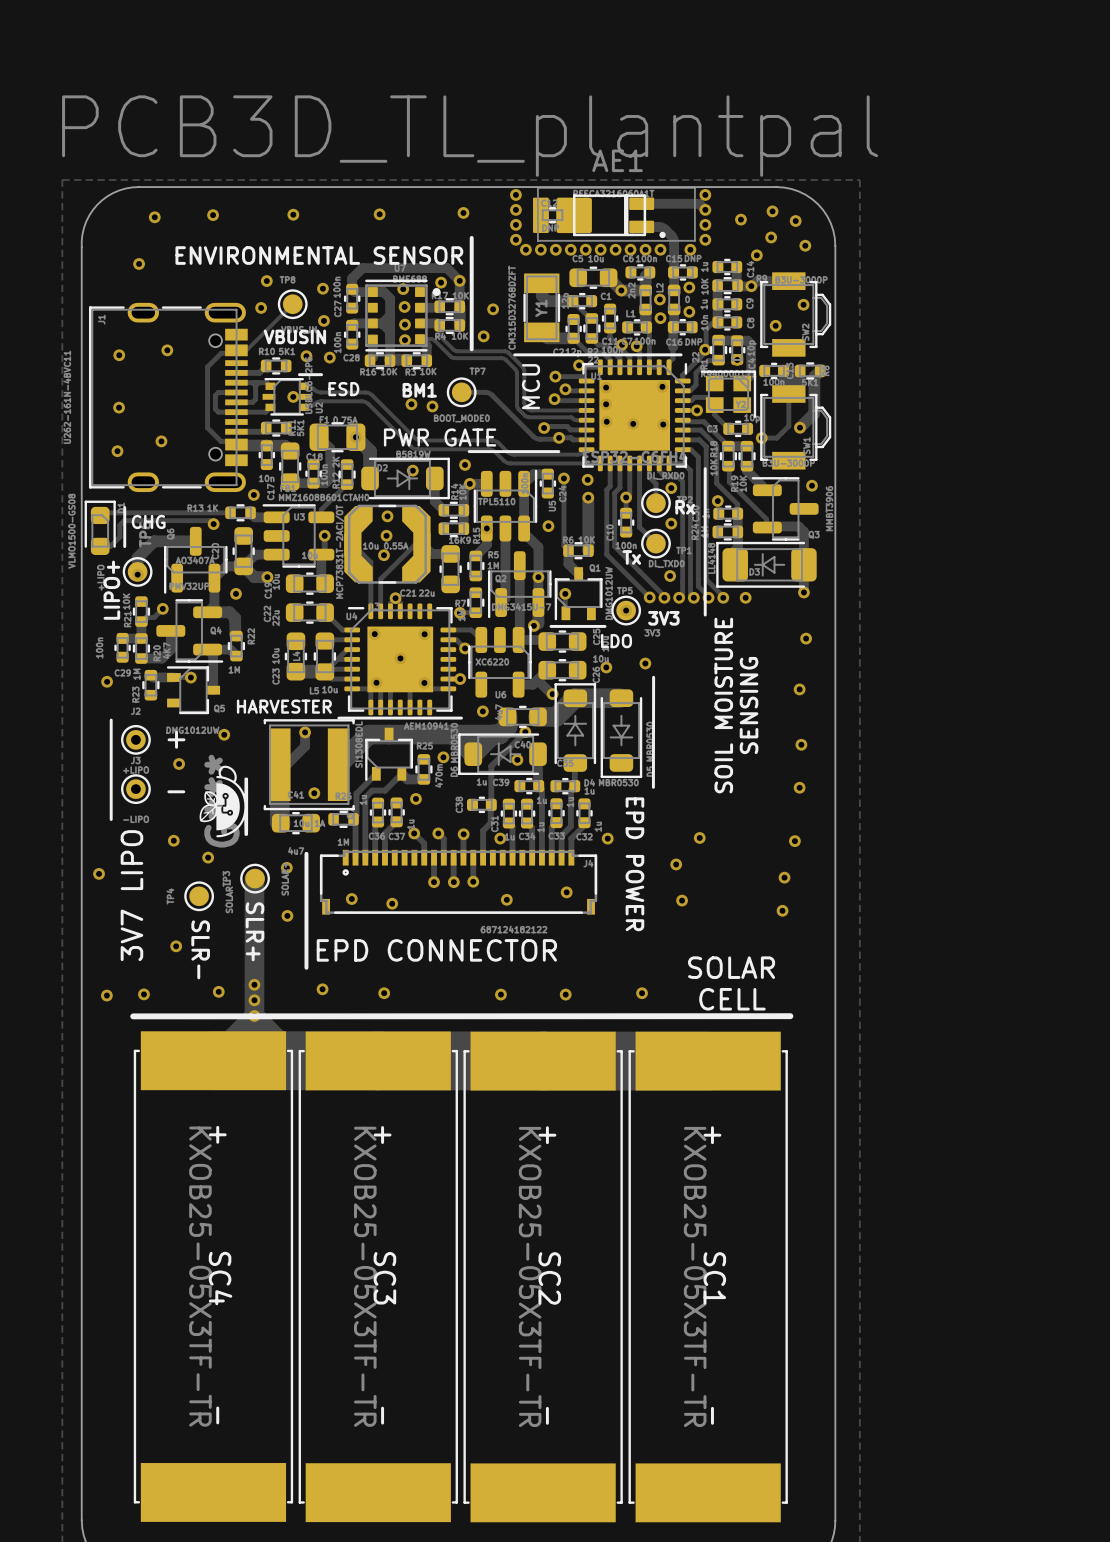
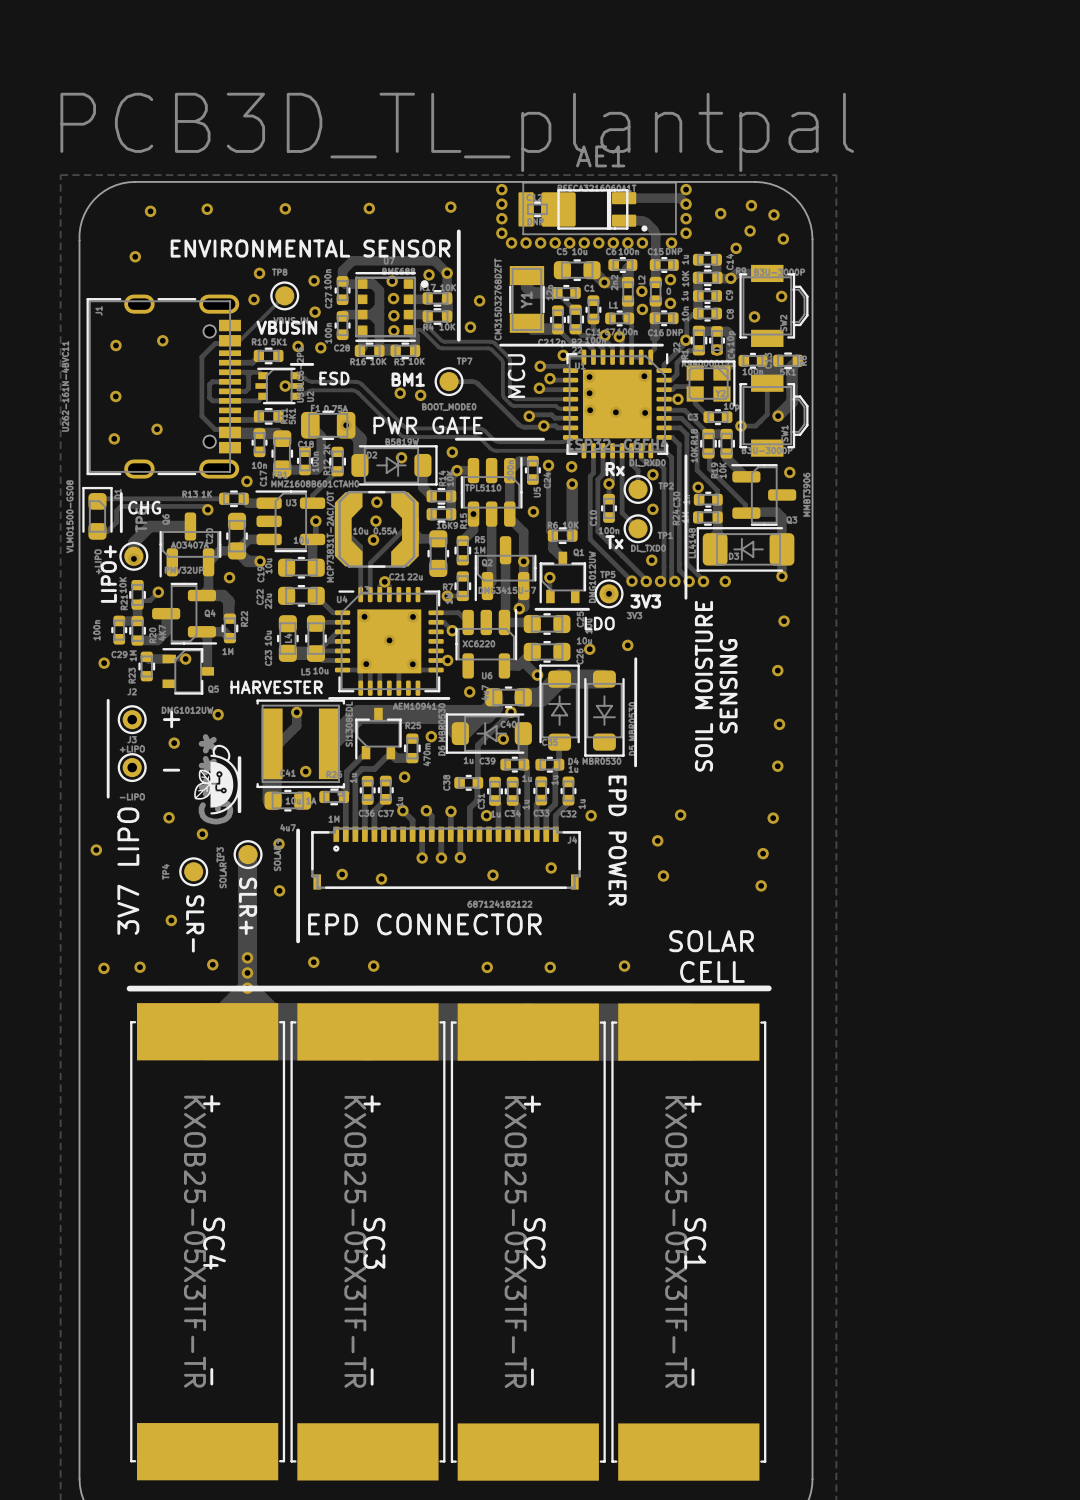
text position: Rx (685, 507) -> Rx (615, 469)

